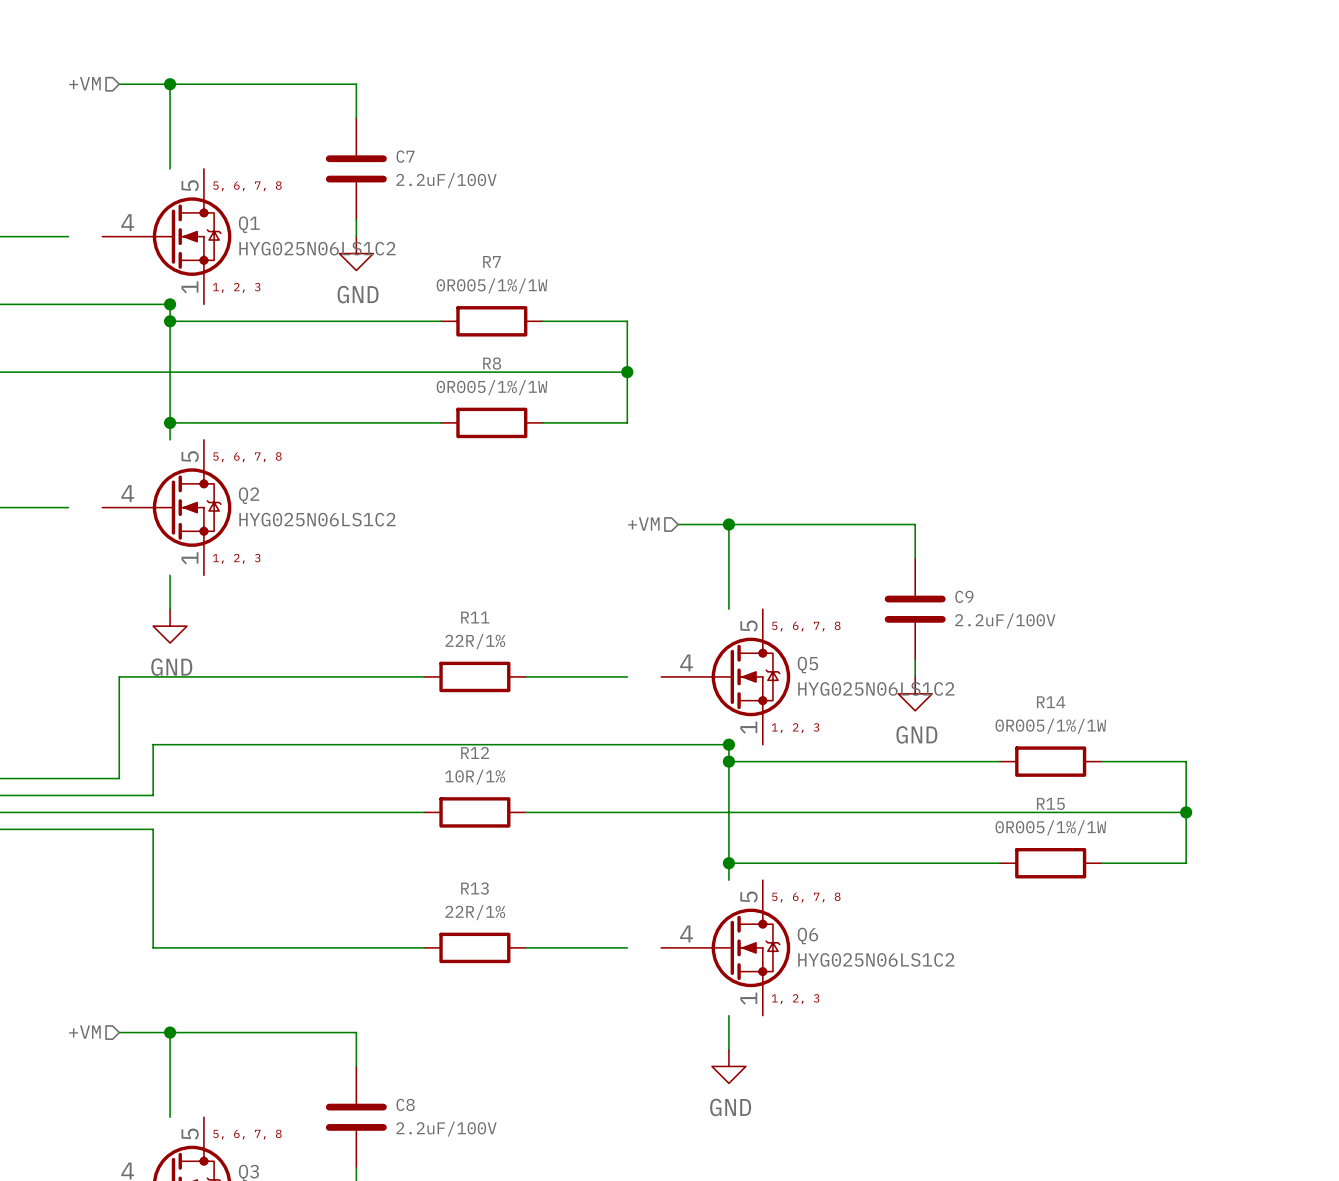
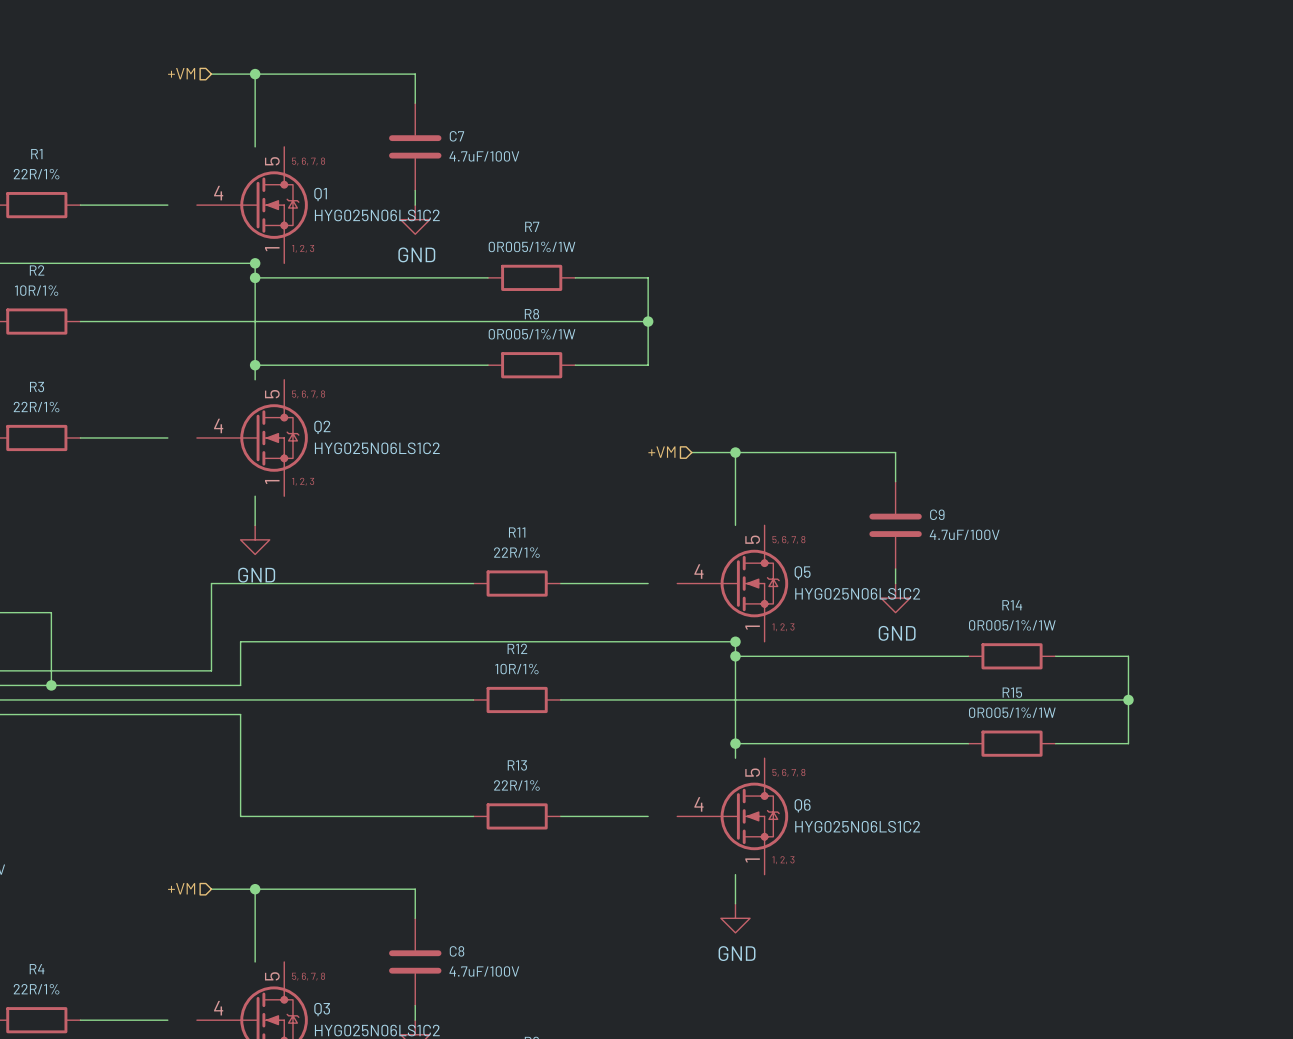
C7 value: 2.2uF/100V (446, 180) -> 4.7uF/100V (484, 156)
C9 value: 2.2uF/100V (1005, 620) -> 4.7uF/100V (964, 534)
C8 value: 2.2uF/100V (446, 1128) -> 4.7uF/100V (484, 971)

